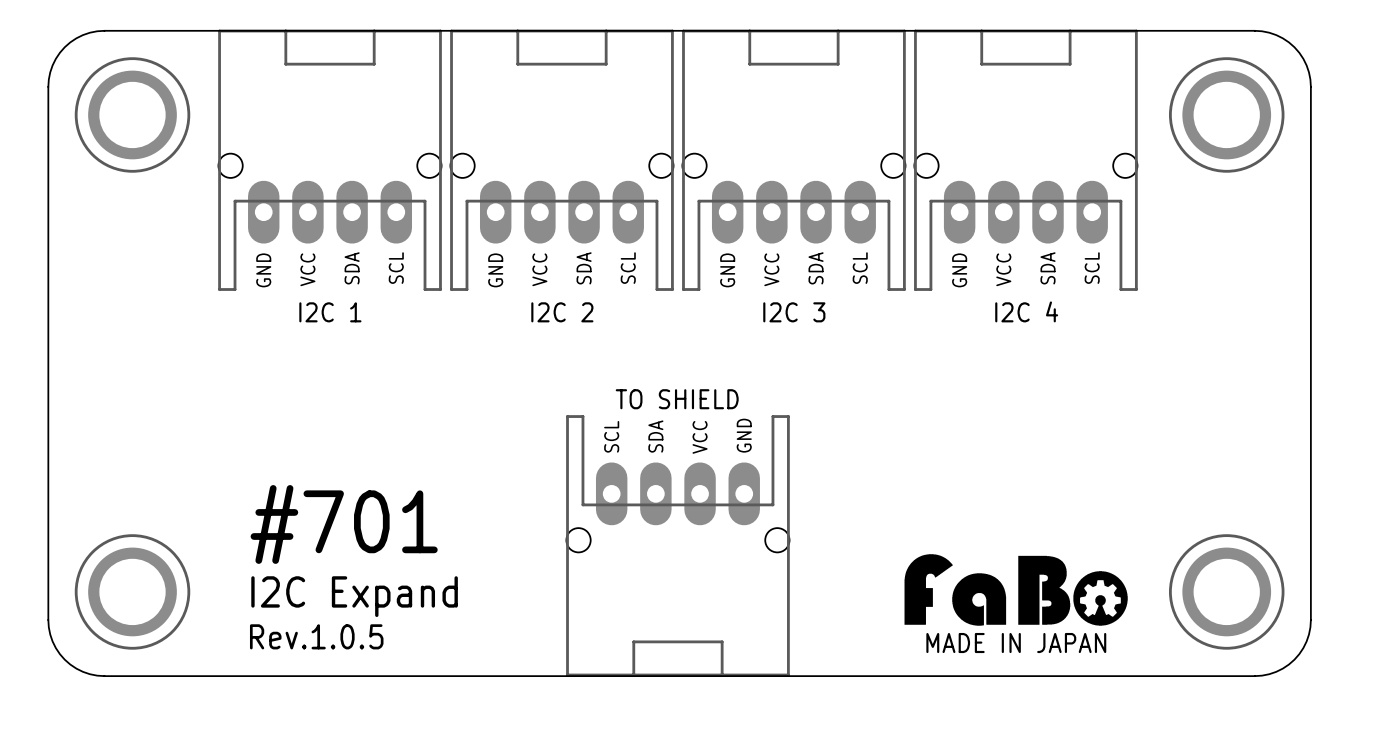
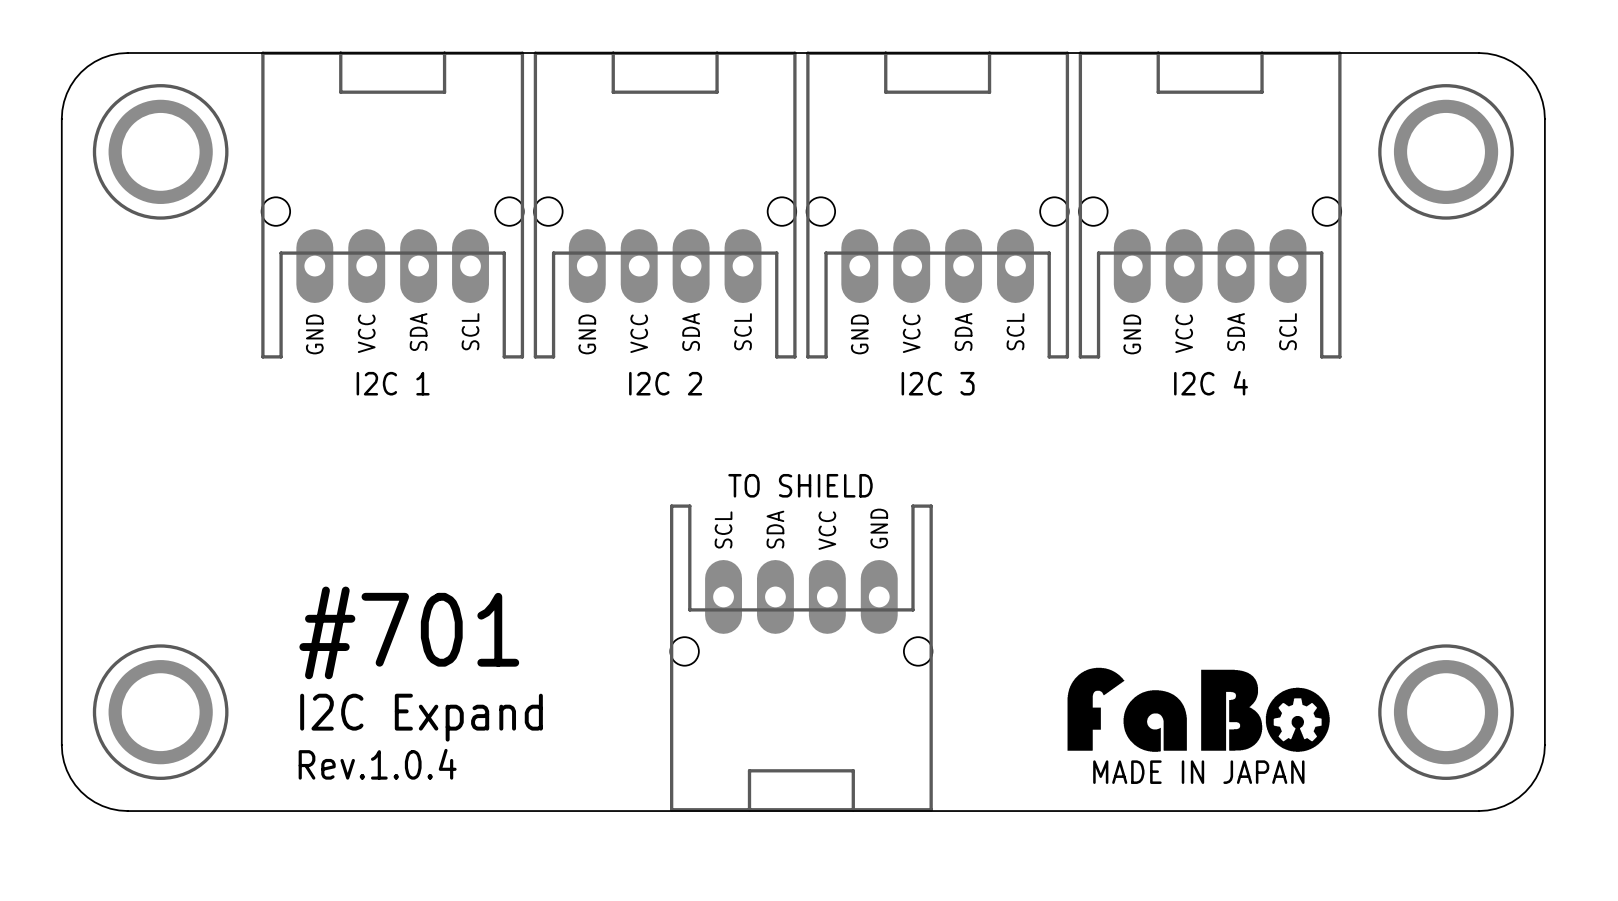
text: Rev.1.0.5 (316, 636) -> Rev.1.0.4 (377, 764)

